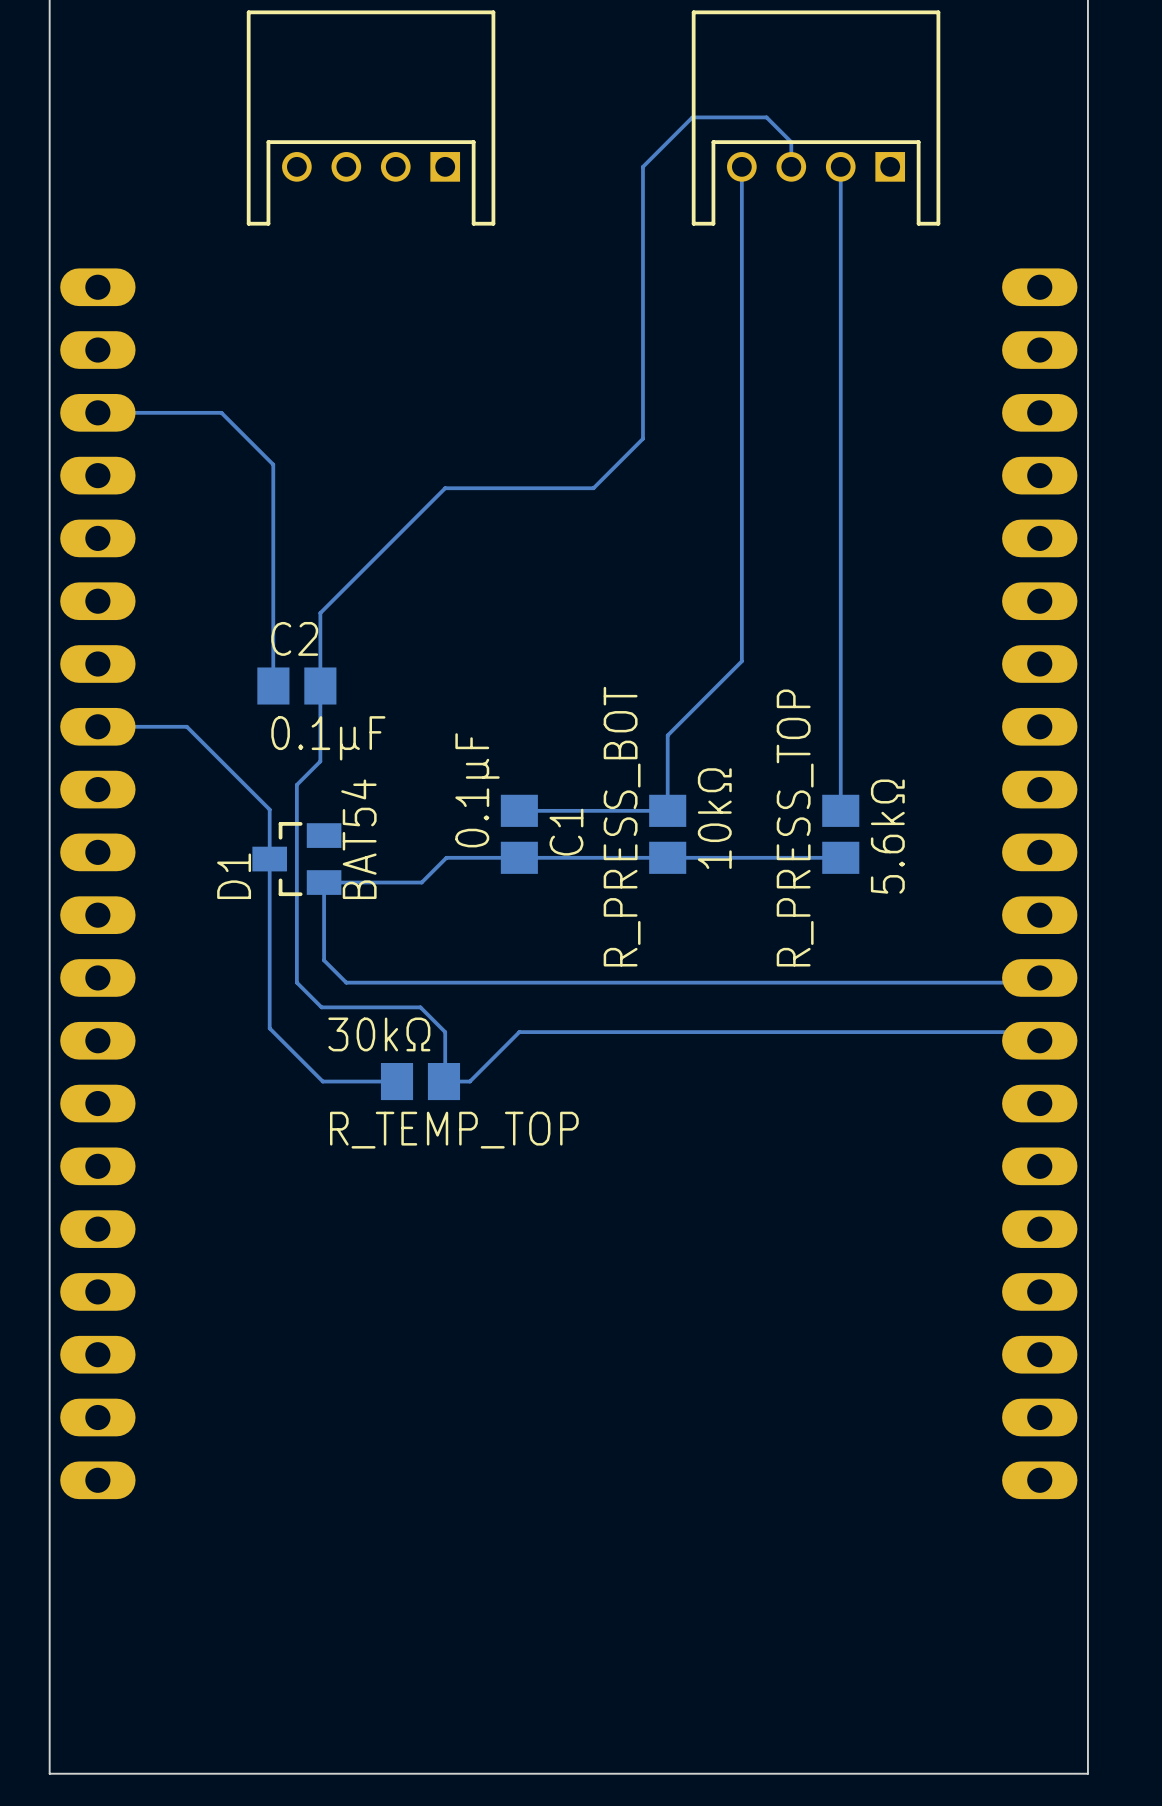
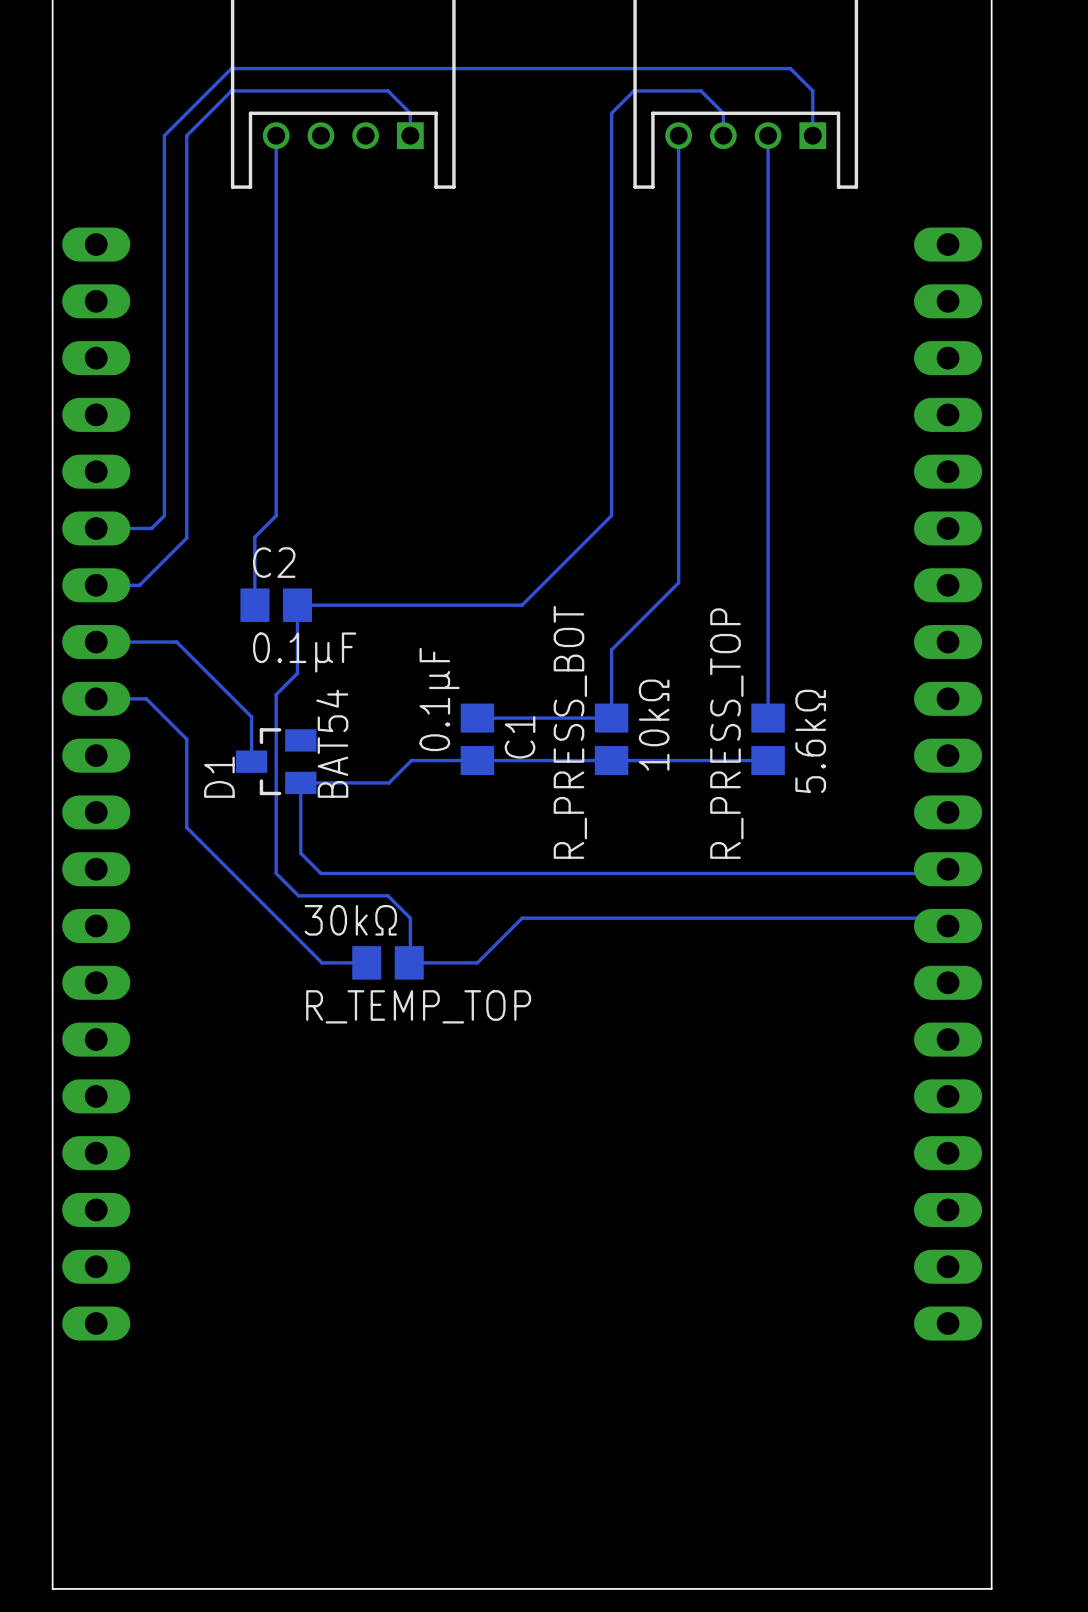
track: (667, 142) (642, 166) (642, 438) (593, 488) (445, 488) (320, 613) (320, 686) -> (611, 113) (611, 515) (522, 605) (297, 605)
track: none -> (410, 135) (410, 113) (388, 90) (231, 90) (186, 135) (186, 538) (139, 585) (96, 585)
track: none -> (812, 135) (812, 90) (790, 68) (231, 68) (164, 135) (164, 515) (151, 528) (96, 528)
track: (97, 412) (221, 412) (273, 464) (273, 610) -> (276, 135) (276, 515) (254, 537)
track: (269, 859) (269, 1028) (322, 1081) (347, 1081) -> (96, 698) (146, 698) (186, 739) (186, 827) (322, 962)
track: (568, 1032) (519, 1032) (469, 1081) -> (522, 918) (477, 962) (432, 962)

